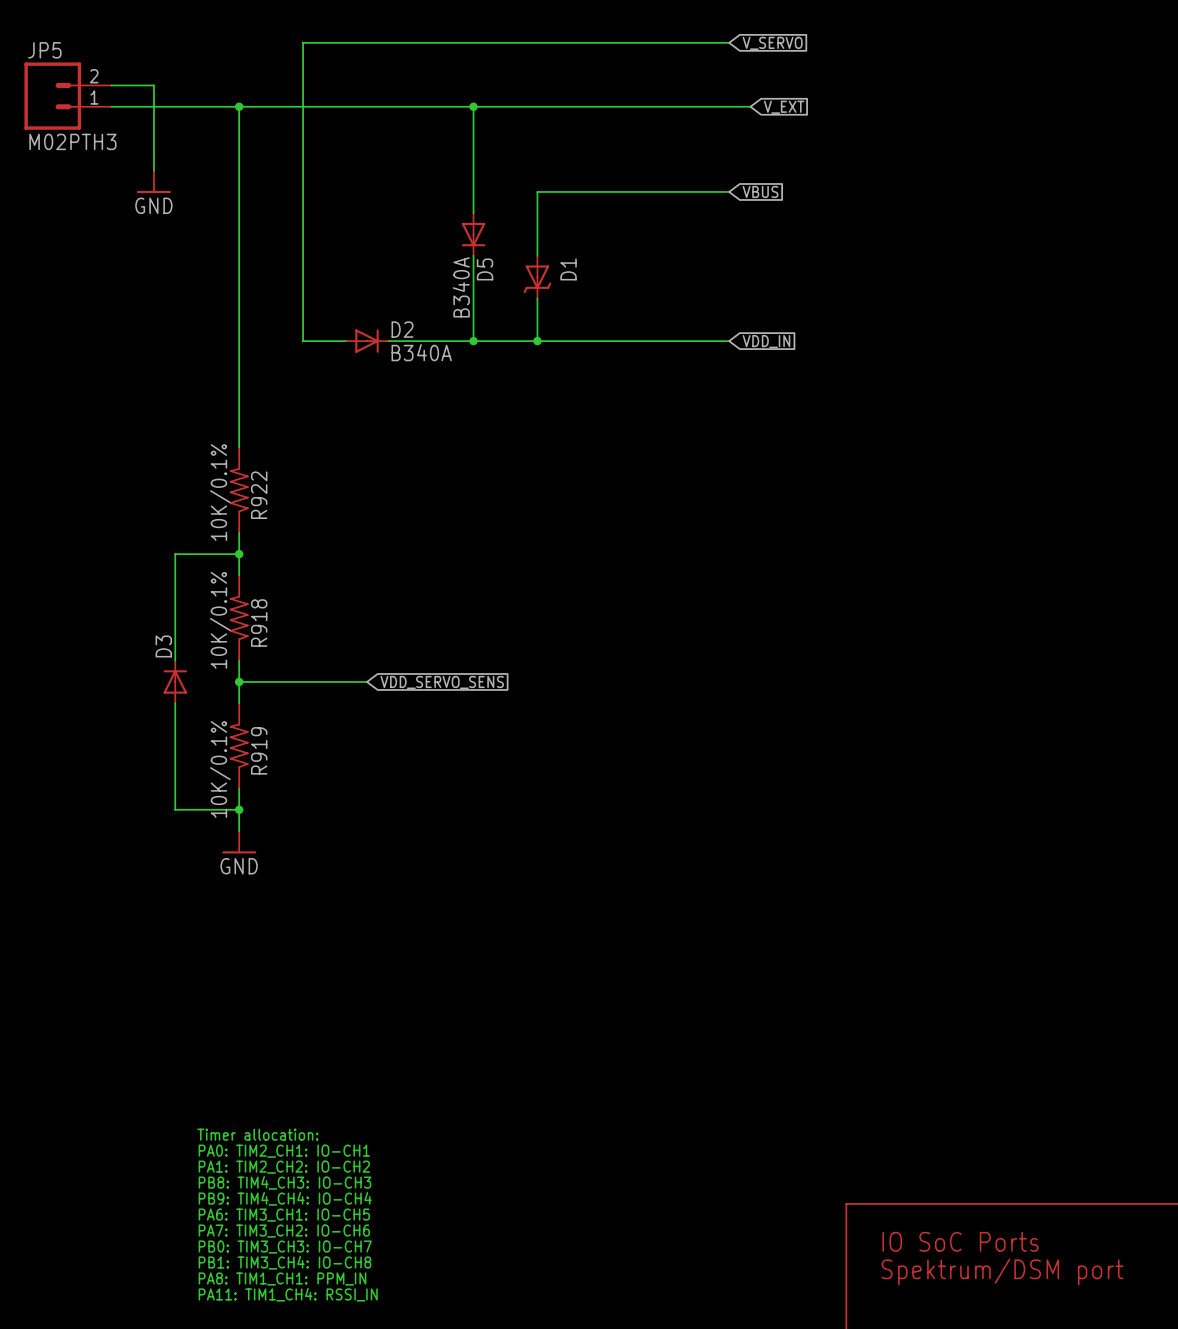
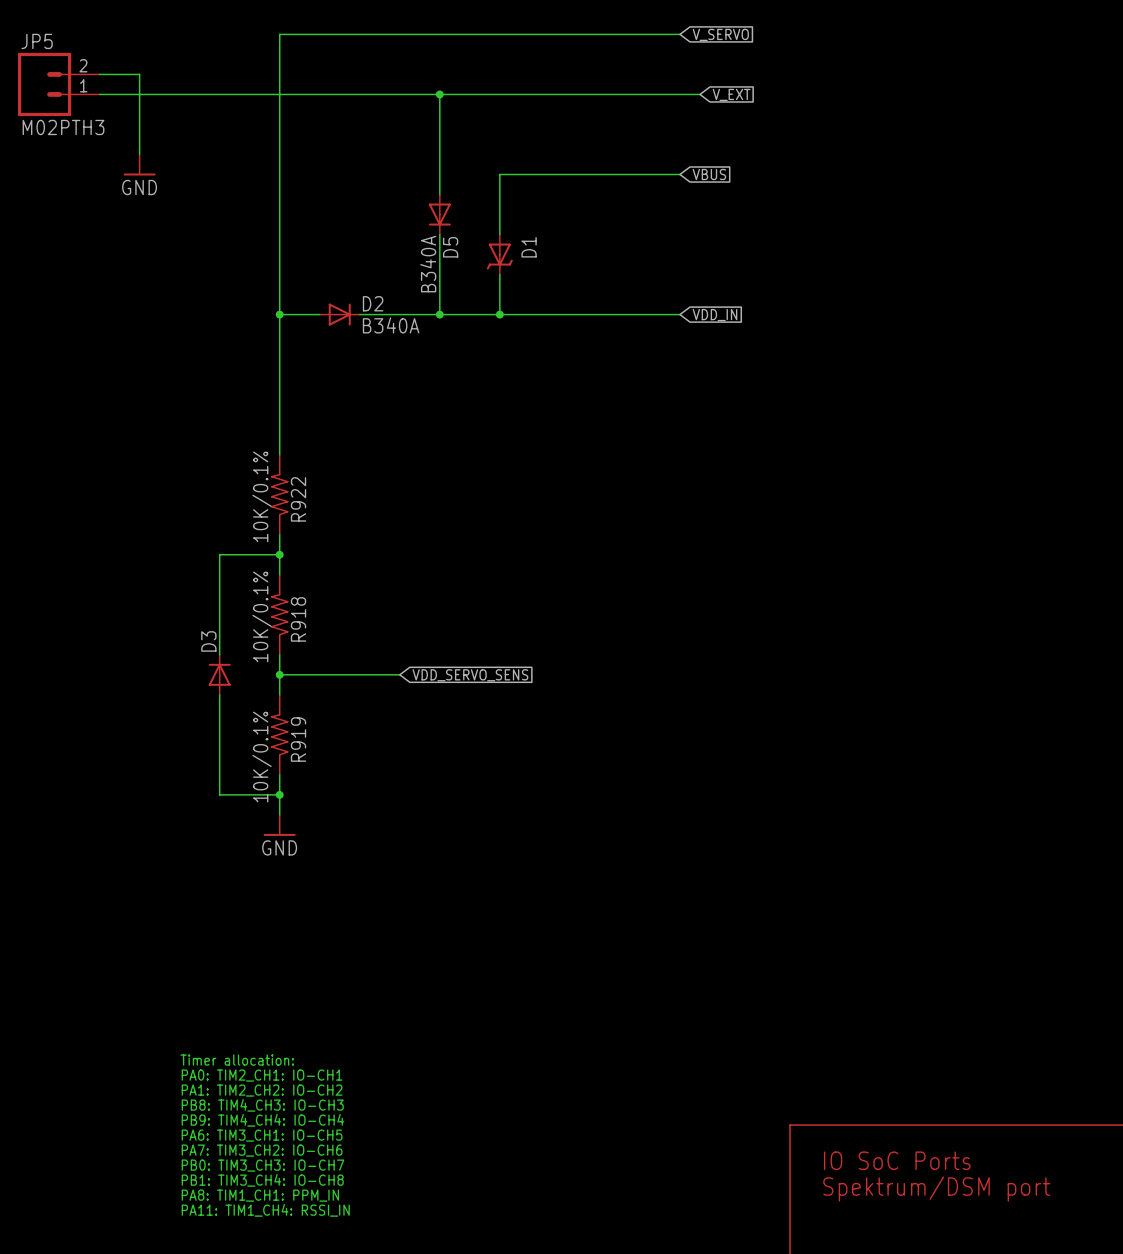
wire: (239, 106) (239, 447) -> none
junction: (239, 106) -> none
wire: none -> (279, 314) (279, 454)
junction: none -> (279, 314)
R922 position: (239, 490) -> (279, 494)
wire: (239, 532) (239, 575) -> (279, 534) (279, 574)
wire: (239, 554) (175, 554) (175, 660) -> none
junction: (239, 554) -> none
wire: none -> (279, 554) (219, 554) (219, 614)
junction: none -> (279, 554)
R918 position: (239, 618) -> (279, 614)
D3 position: (175, 681) -> (219, 674)
wire: (239, 681) (367, 681) -> (279, 674) (399, 674)
junction: (239, 681) -> none
global label position: VDD_SERVO_SENS (442, 682) -> VDD_SERVO_SENS (470, 675)
wire: (175, 703) (175, 809) (239, 809) -> none
wire: none -> (279, 654) (279, 694)
junction: none -> (279, 674)
R919 position: (239, 745) -> (279, 734)
junction: (239, 809) -> none
wire: none -> (219, 774) (219, 794) (279, 794)
wire: none -> (279, 774) (279, 814)
power symbol position: GND (239, 842) -> GND (279, 825)
junction: none -> (279, 794)

